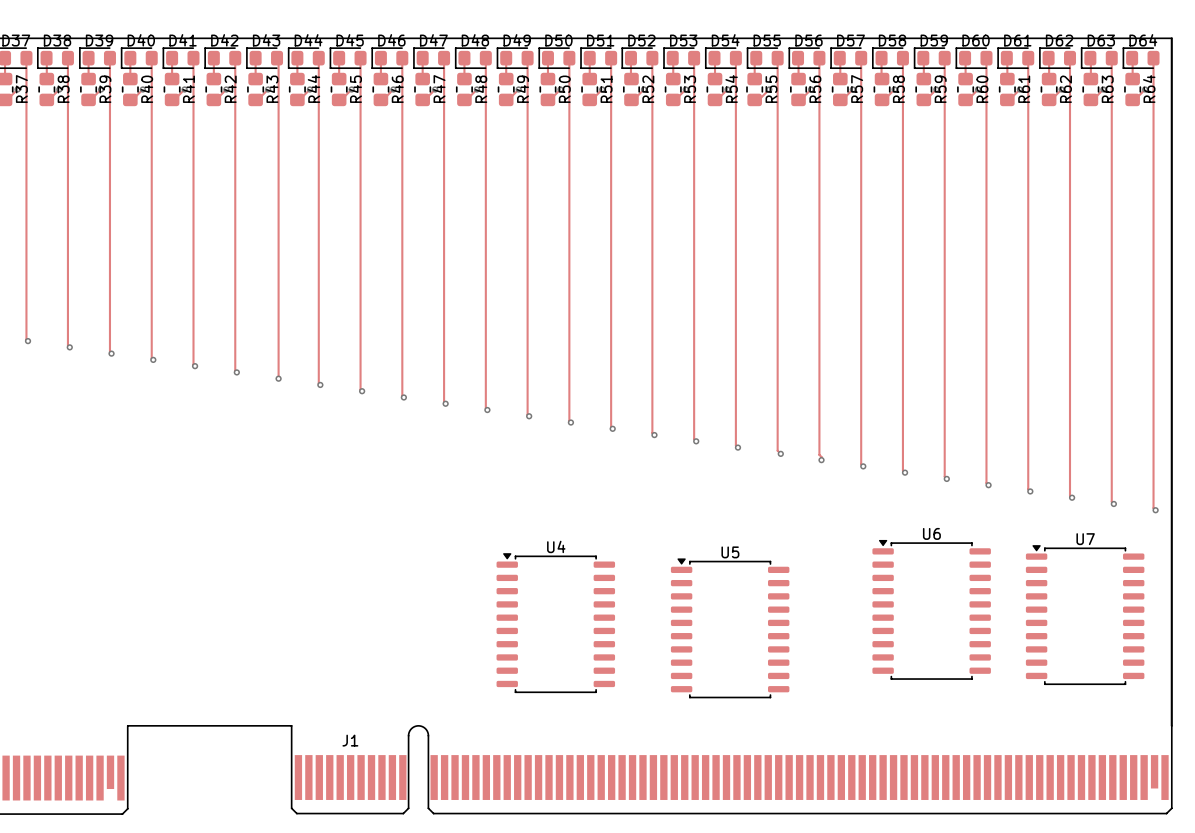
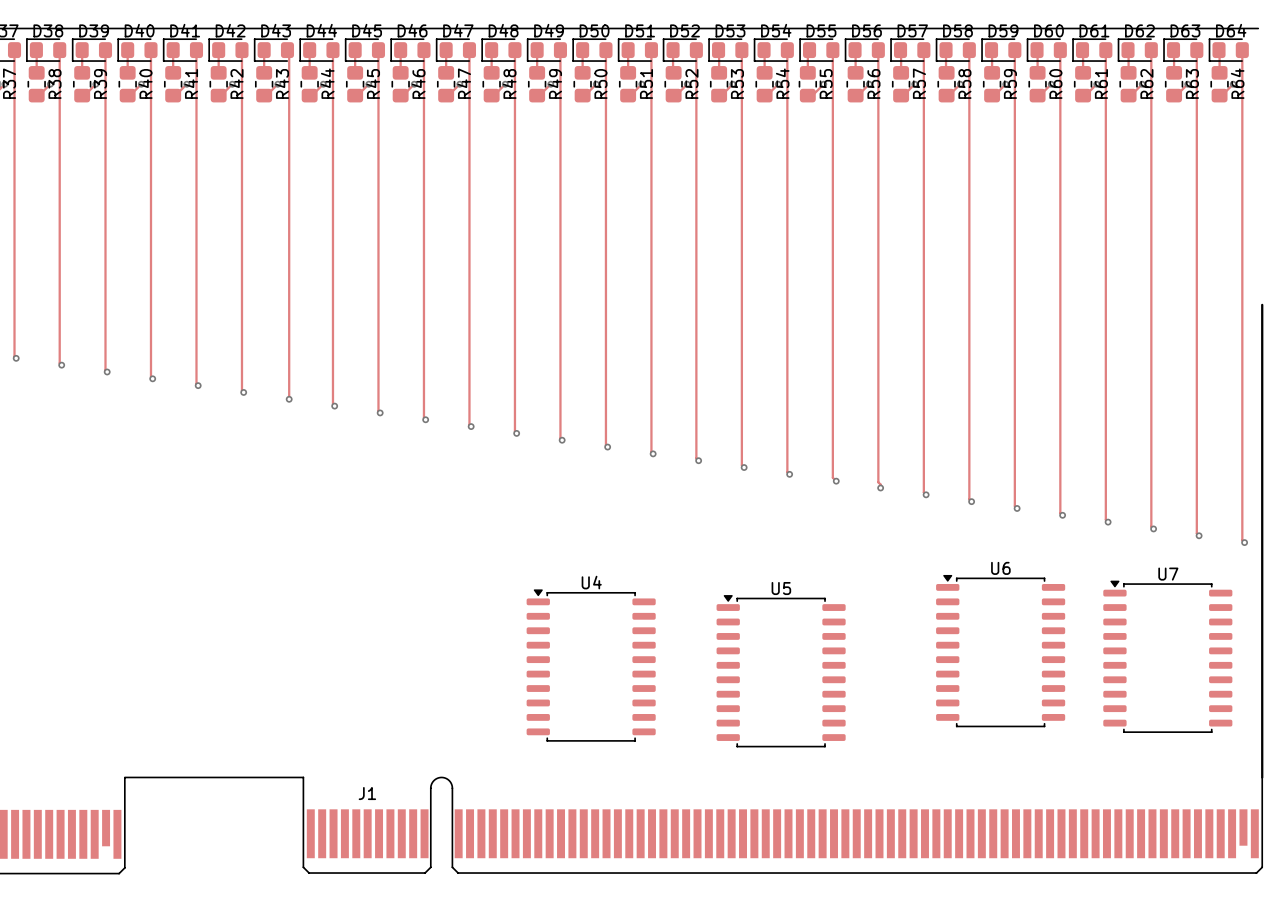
board edge: (1168, 38) (1171, 38) (1171, 292) -> none

